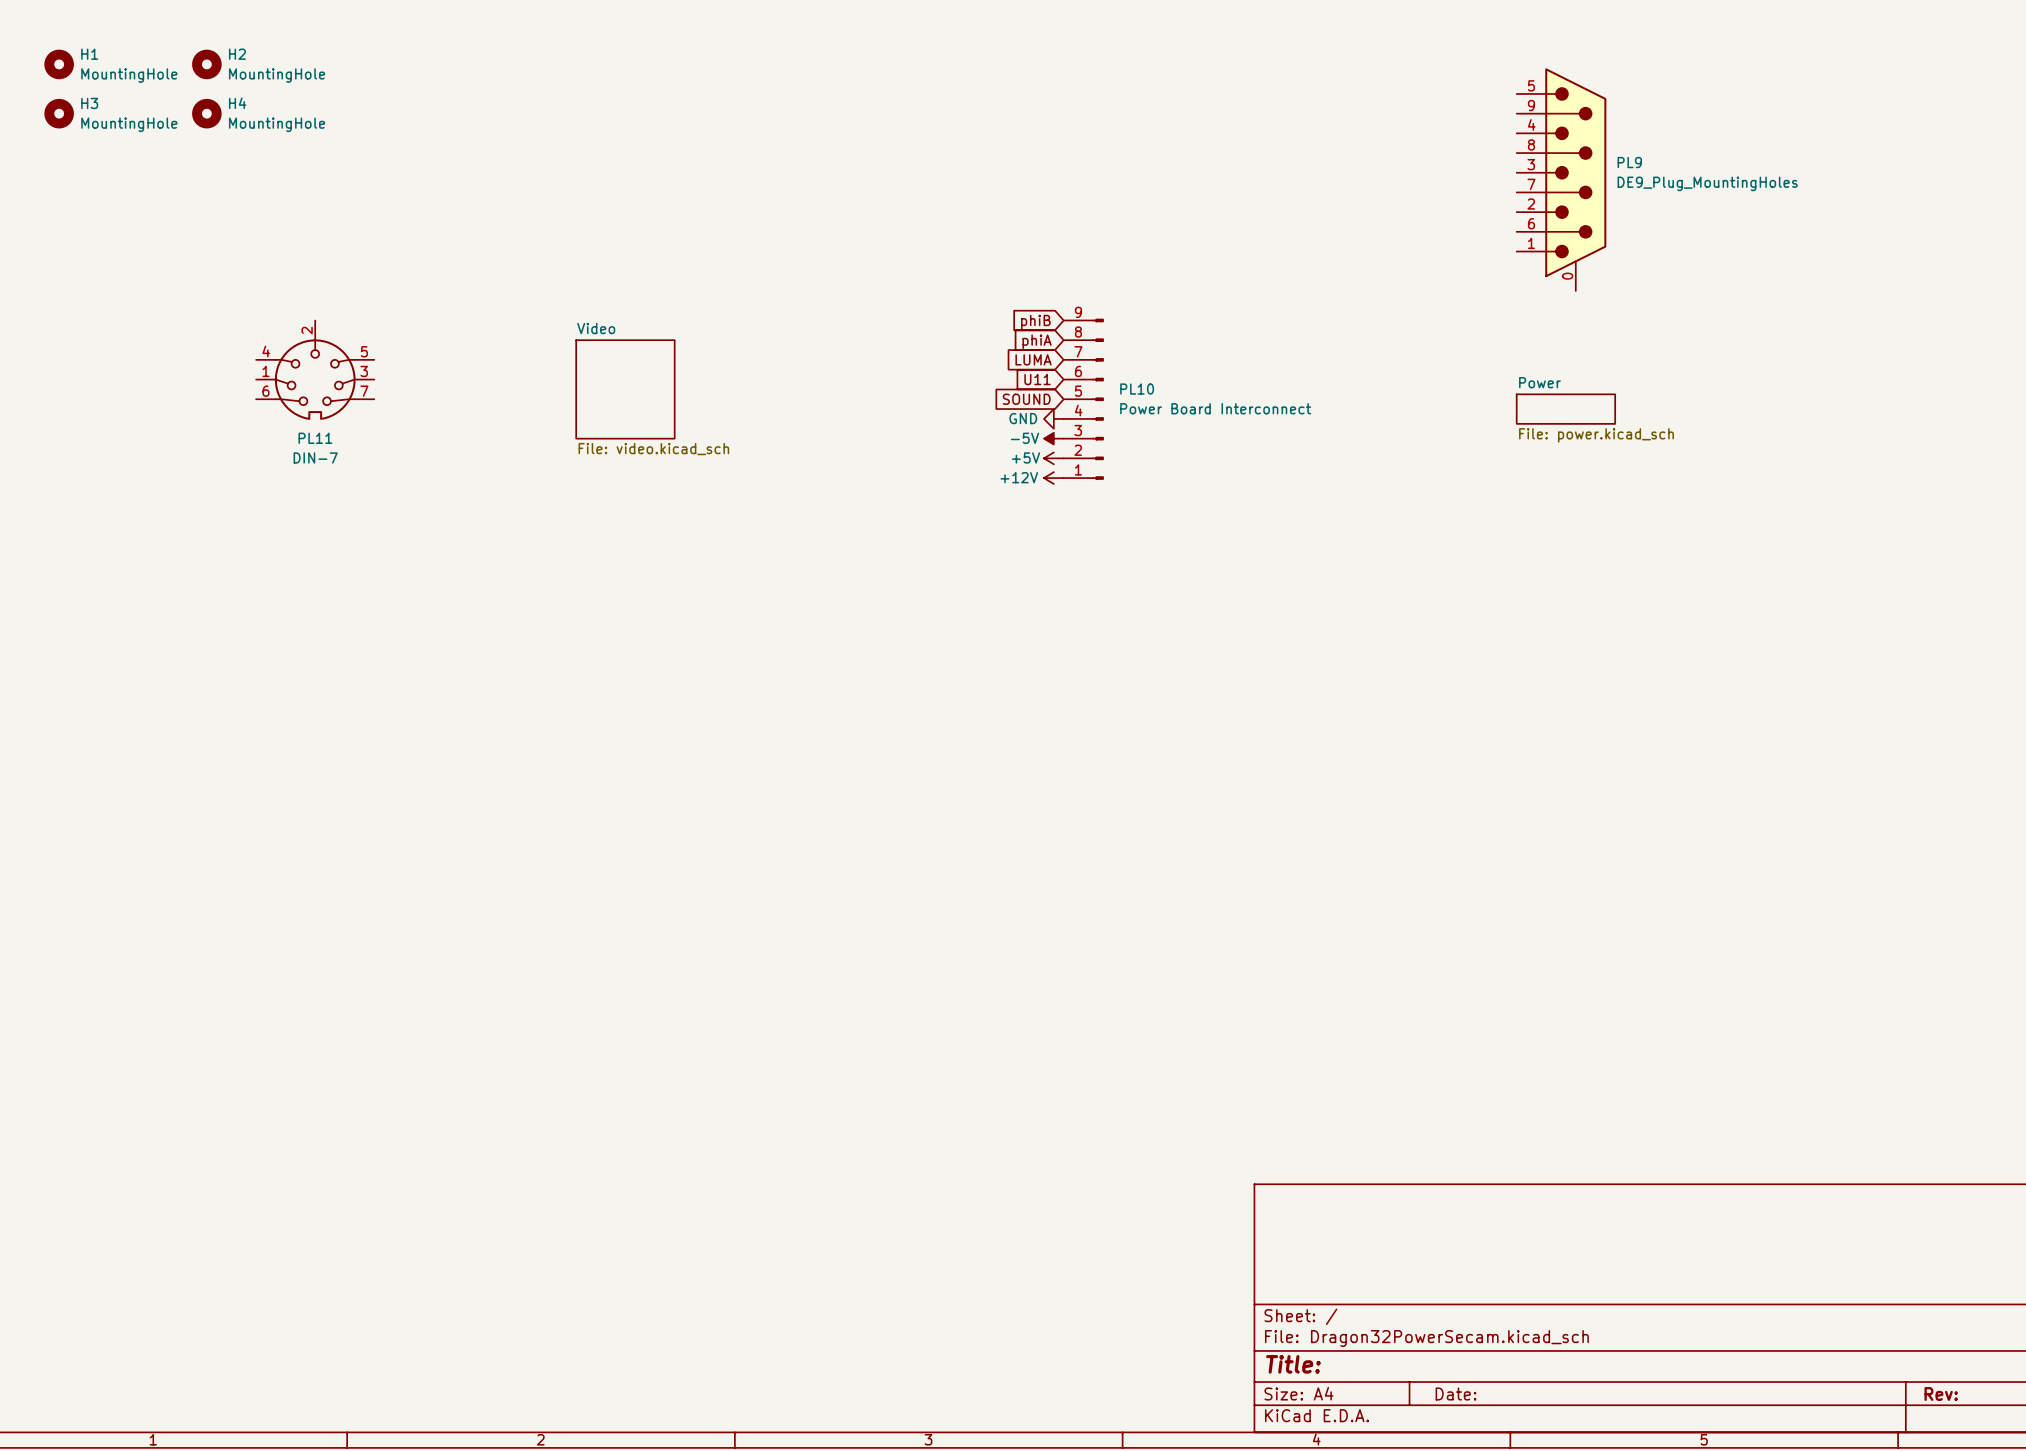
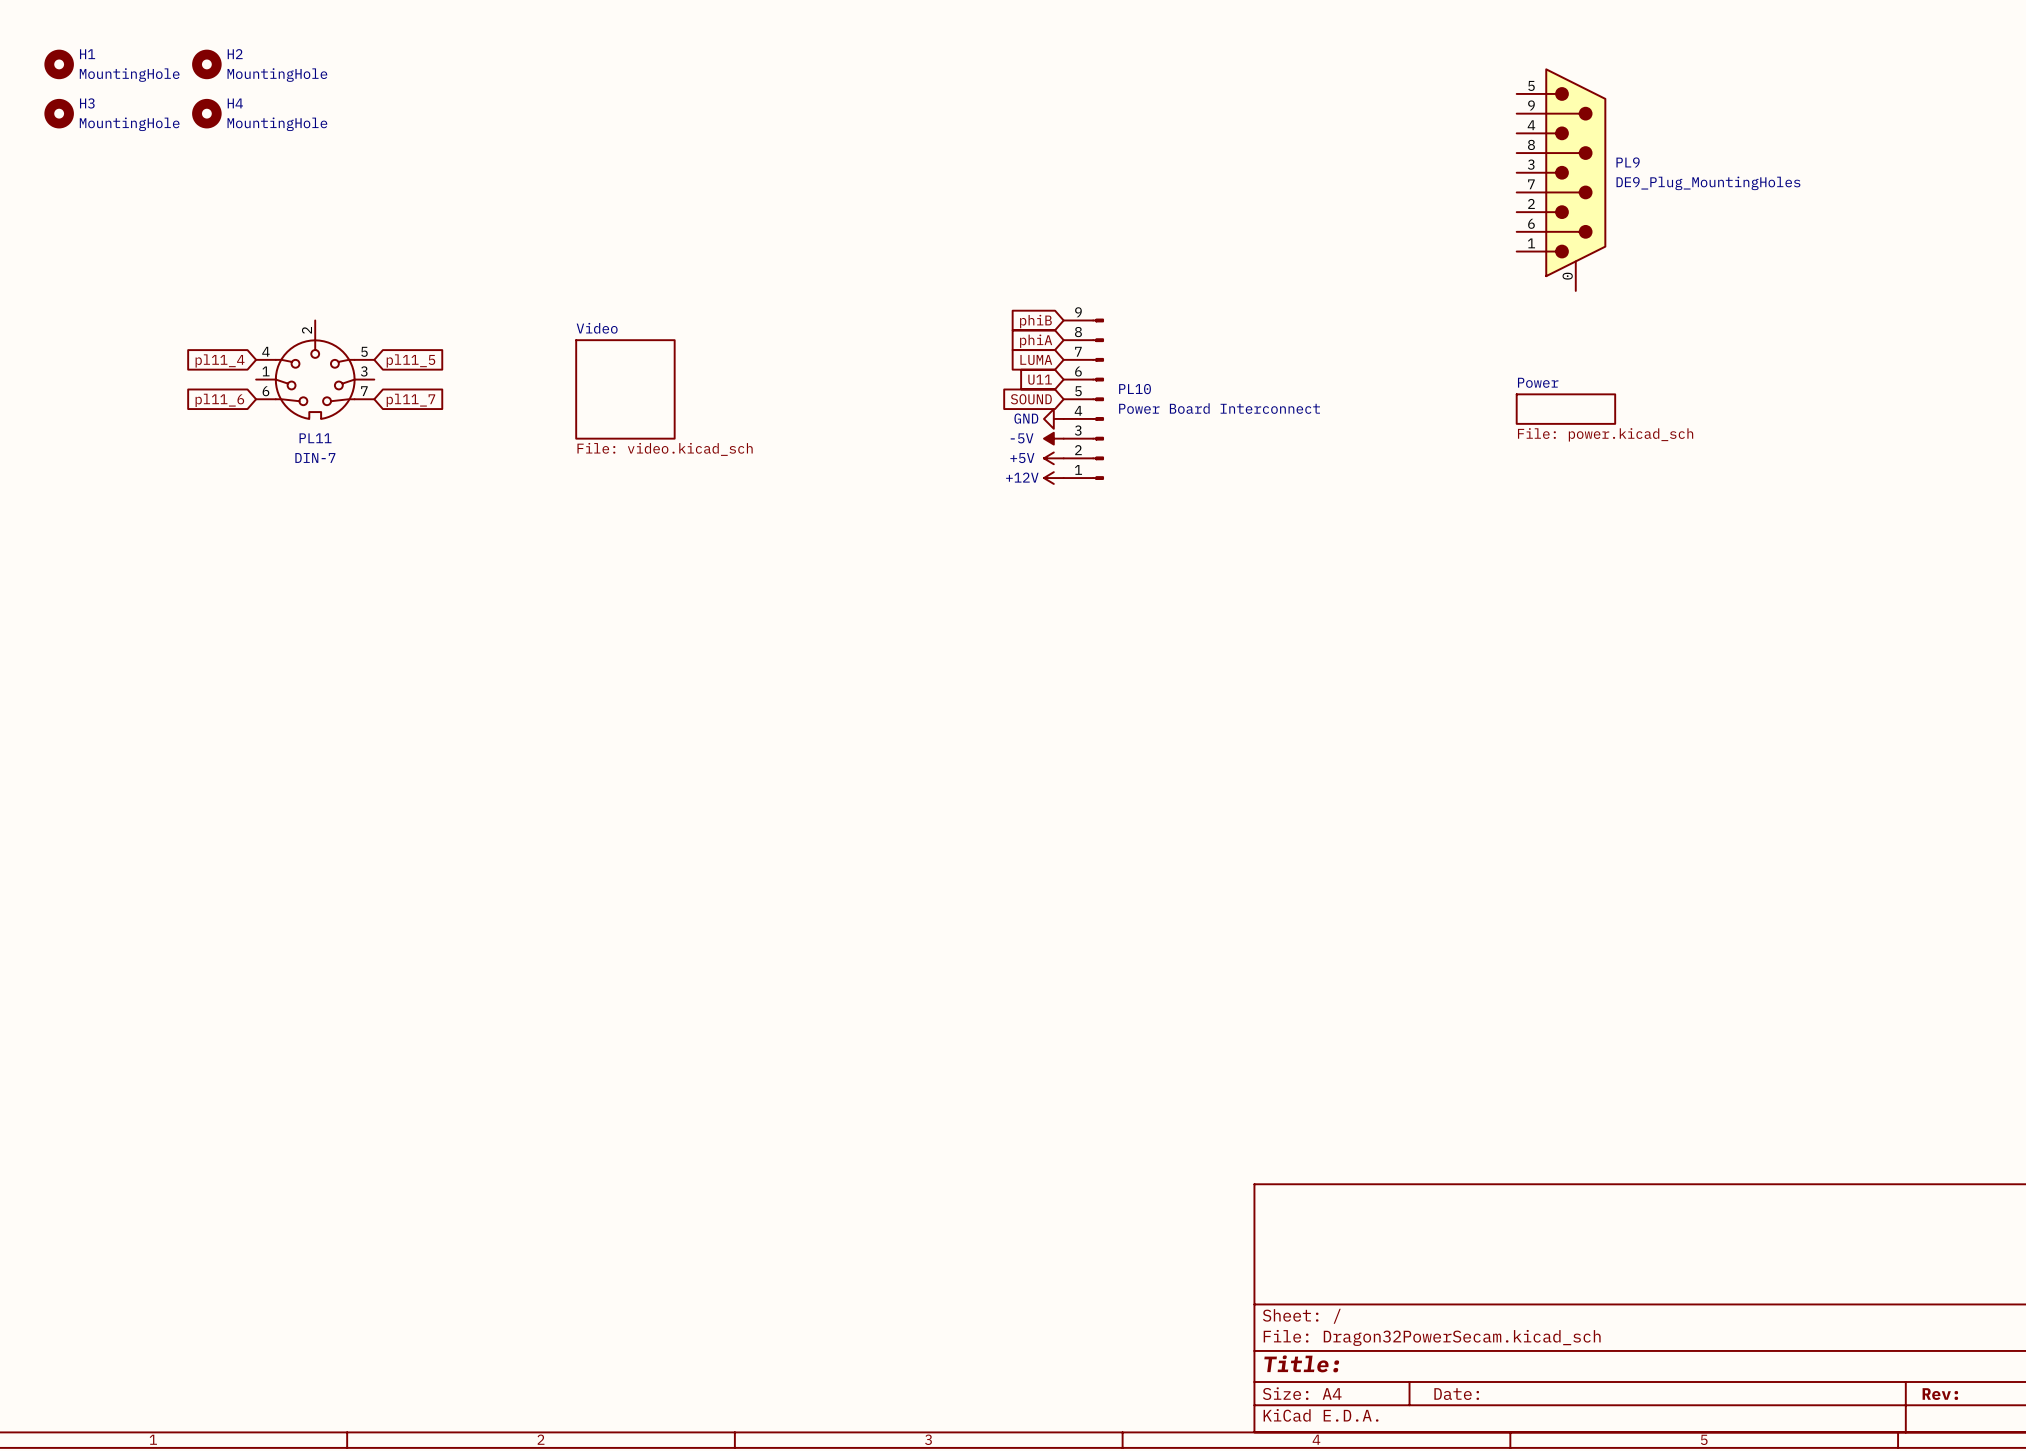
global label: none -> pl11_4 (220, 360)
global label: none -> pl11_5 (410, 360)
global label: none -> pl11_6 (219, 400)
global label: none -> pl11_7 (410, 400)

